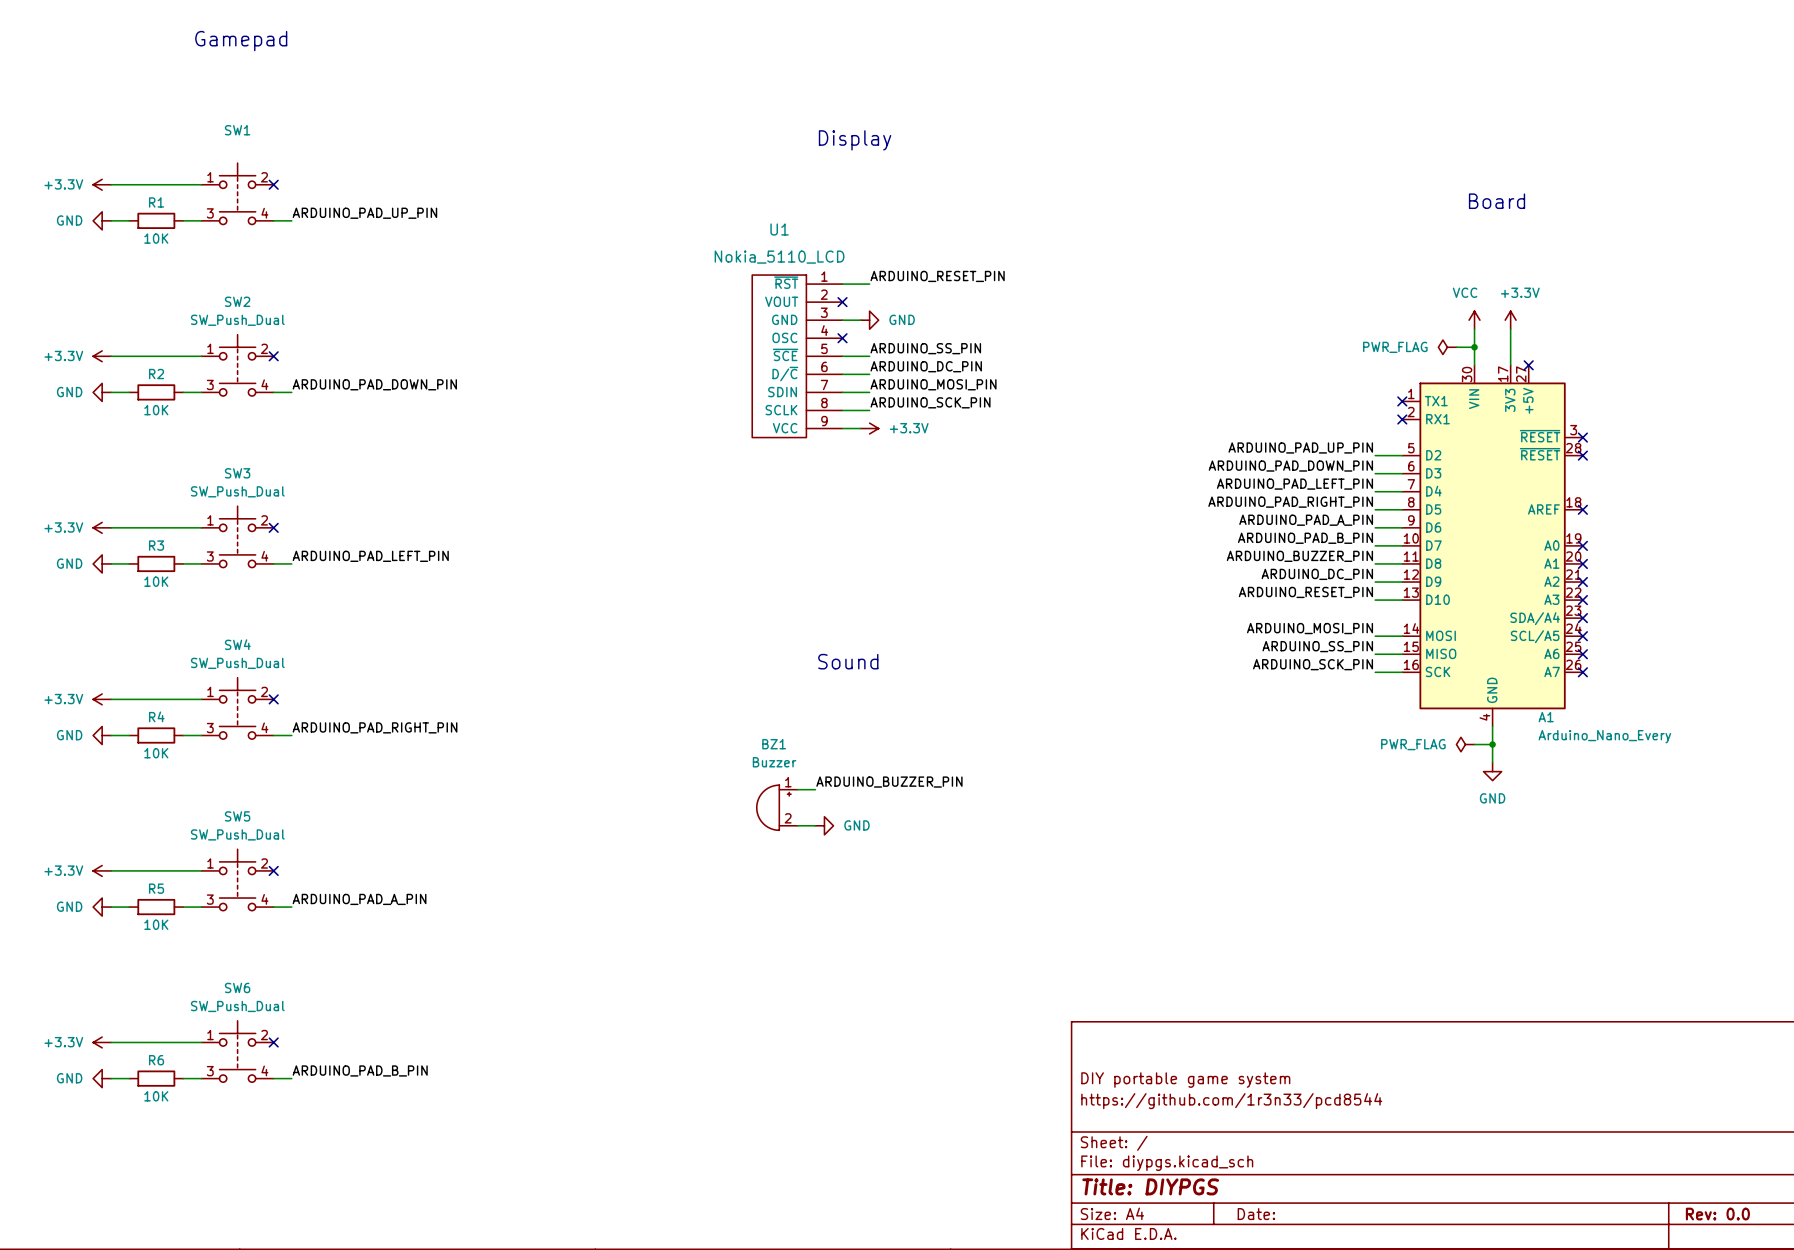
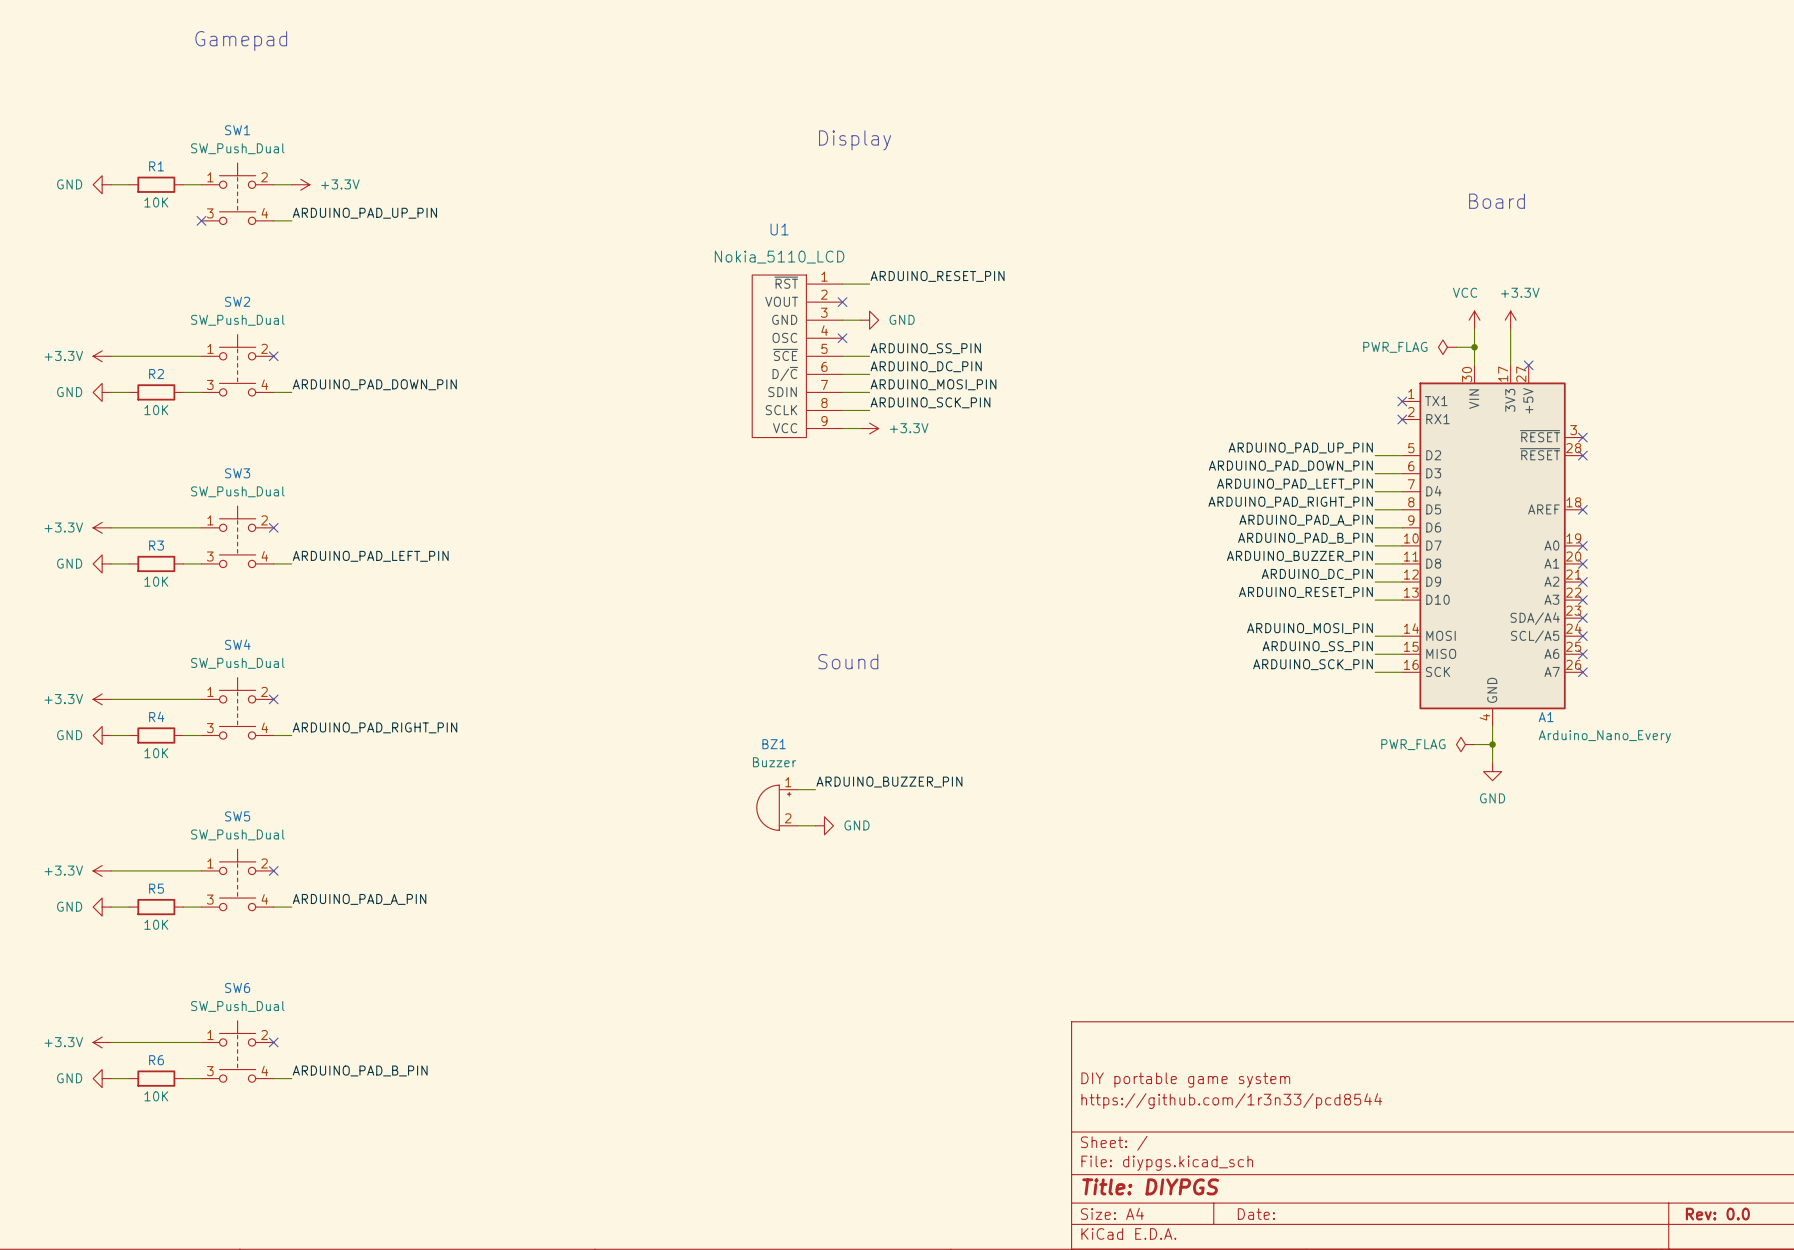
SW1 value: none -> SW_Push_Dual (237, 148)
power symbol: +3.3V (102, 184) -> GND (102, 184)
wire: (129, 184) (183, 184) -> none
no-connect mark: (273, 184) -> none
power symbol: none -> +3.3V (300, 184)
power symbol: GND (102, 220) -> none
wire: (111, 220) (129, 220) -> none
R1 position: (156, 220) -> (156, 184)
wire: (183, 220) (201, 220) -> (273, 184) (291, 184)
no-connect mark: none -> (201, 220)

